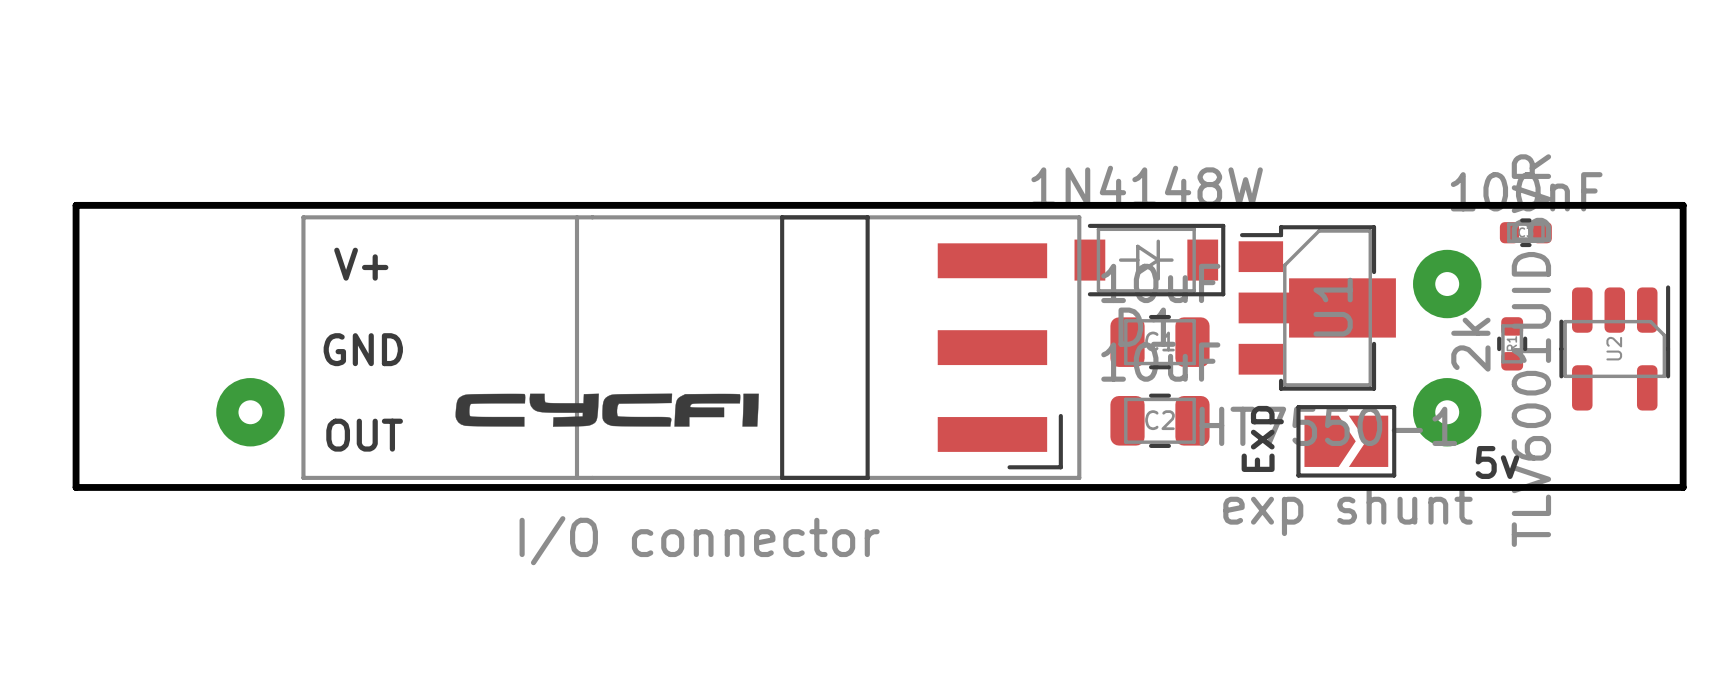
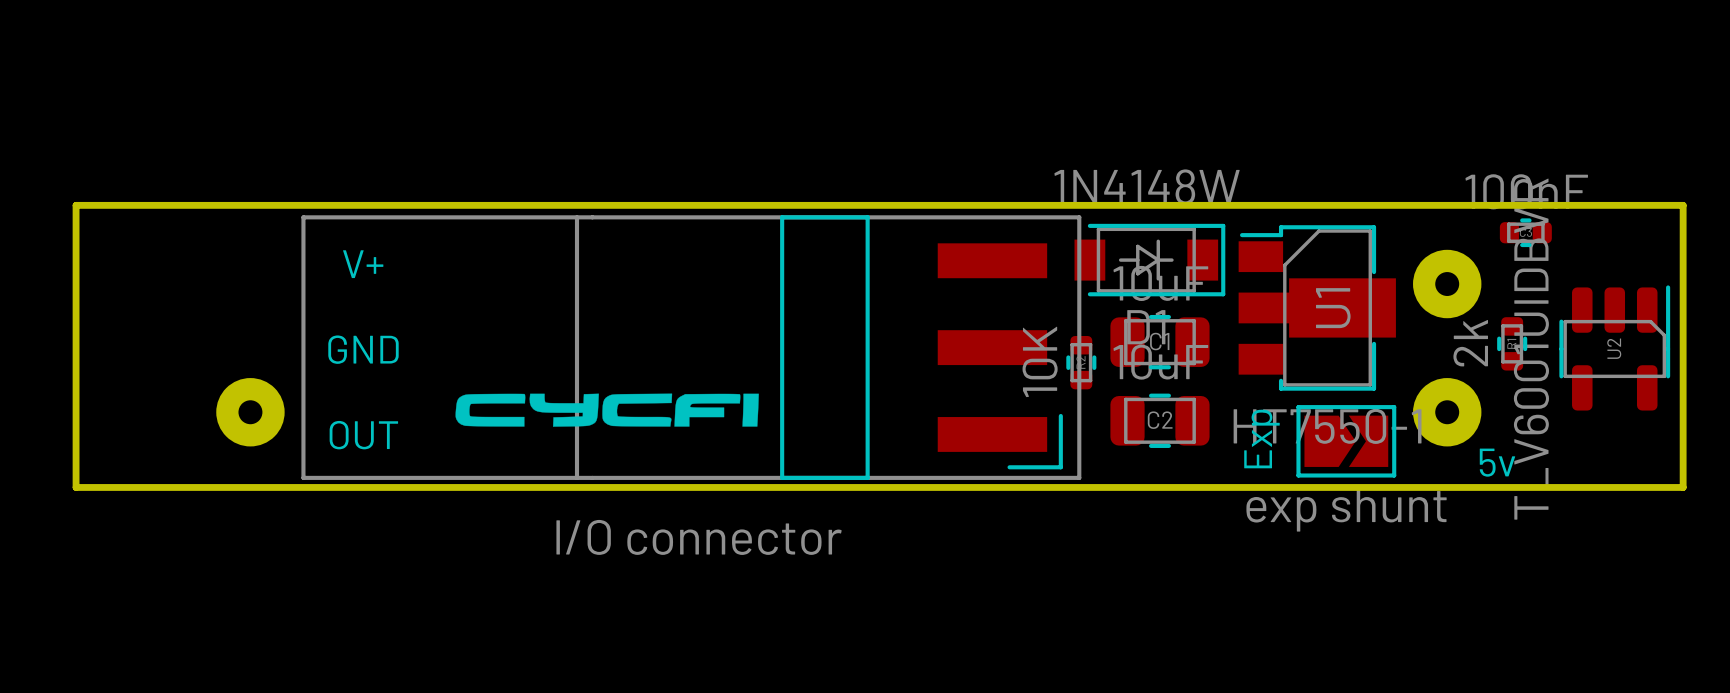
part: none -> 10K (1081, 362)

